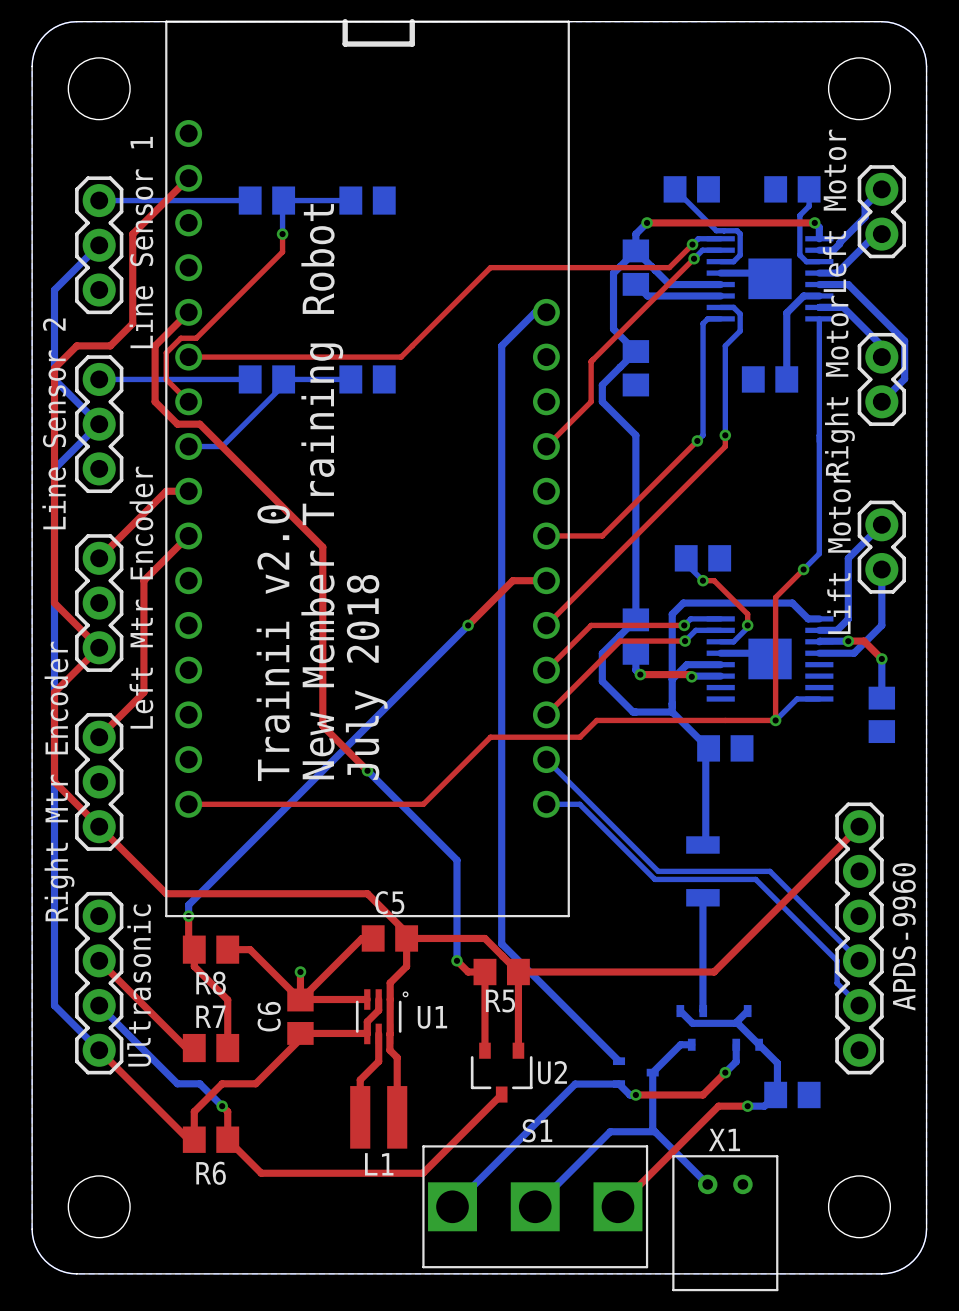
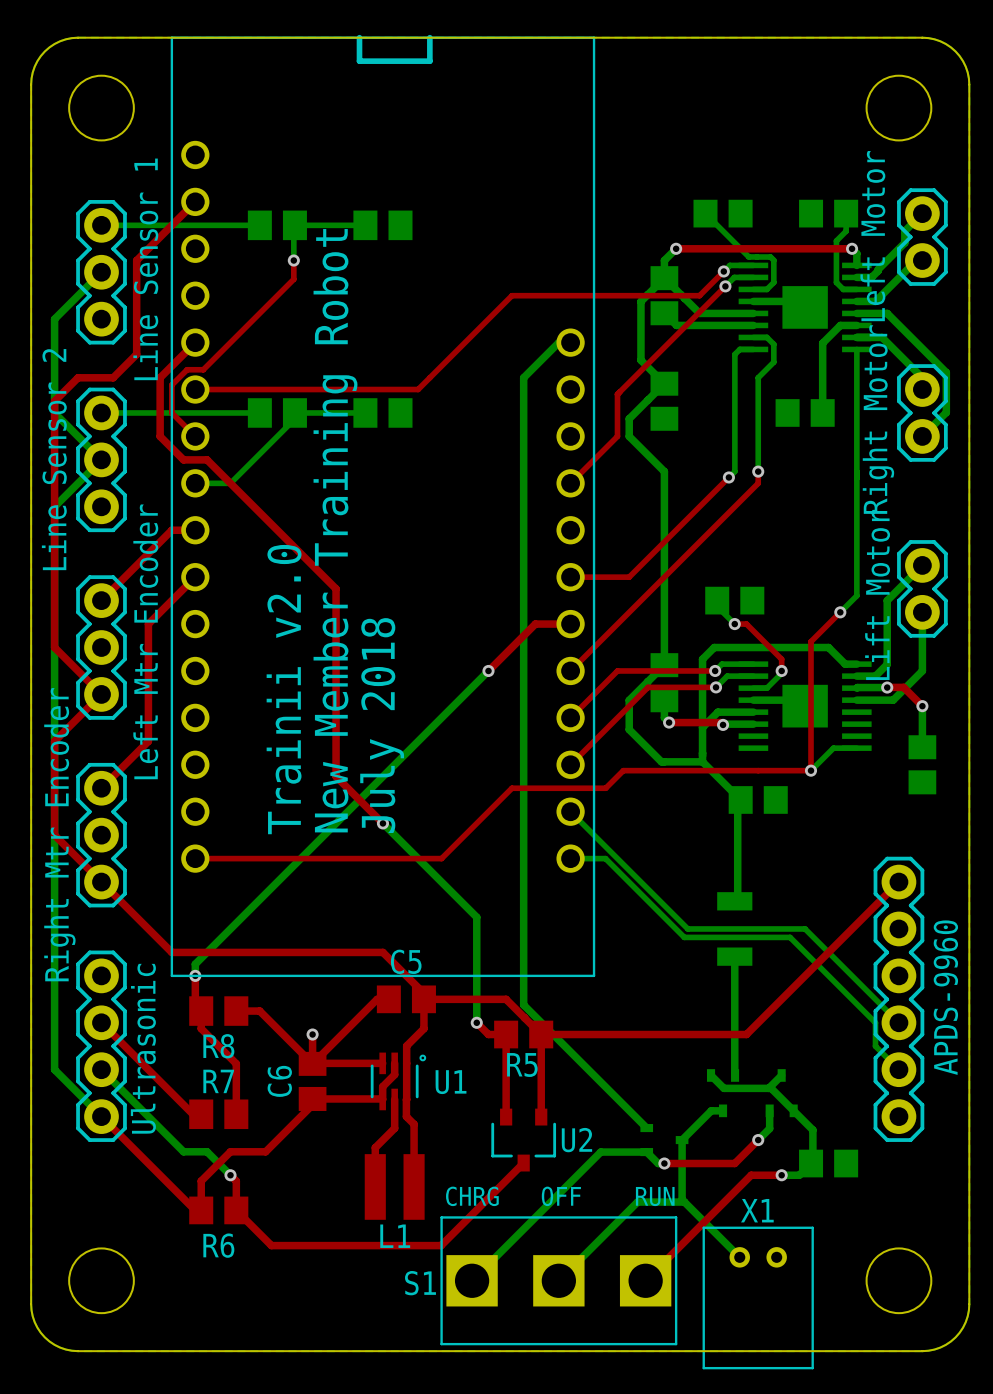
text: none -> CHRG (472, 1196)
text: none -> OFF (561, 1196)
text: none -> RUN (655, 1196)
S1 name position: S1 (537, 1130) -> S1 (420, 1283)

